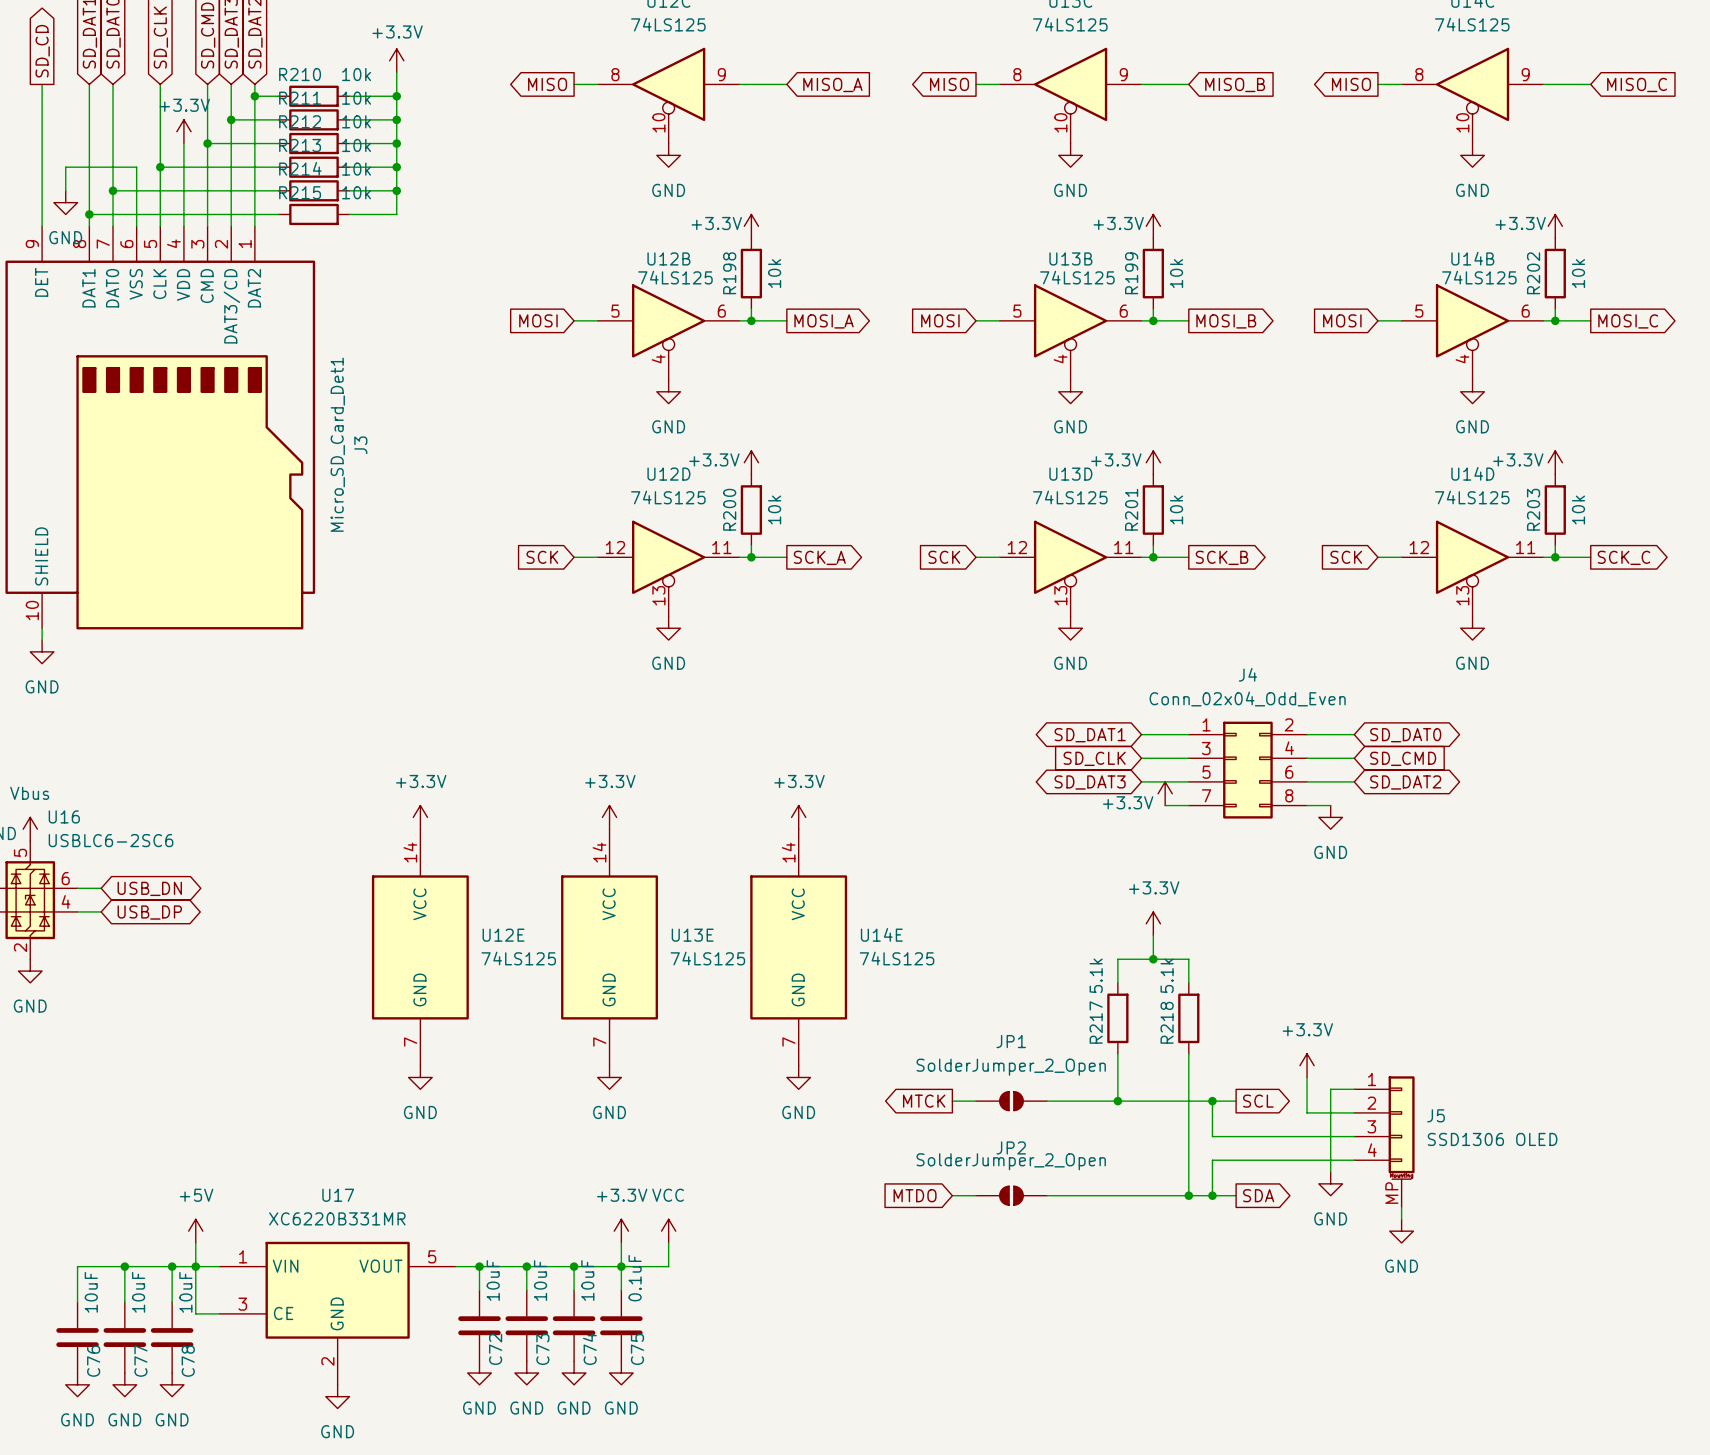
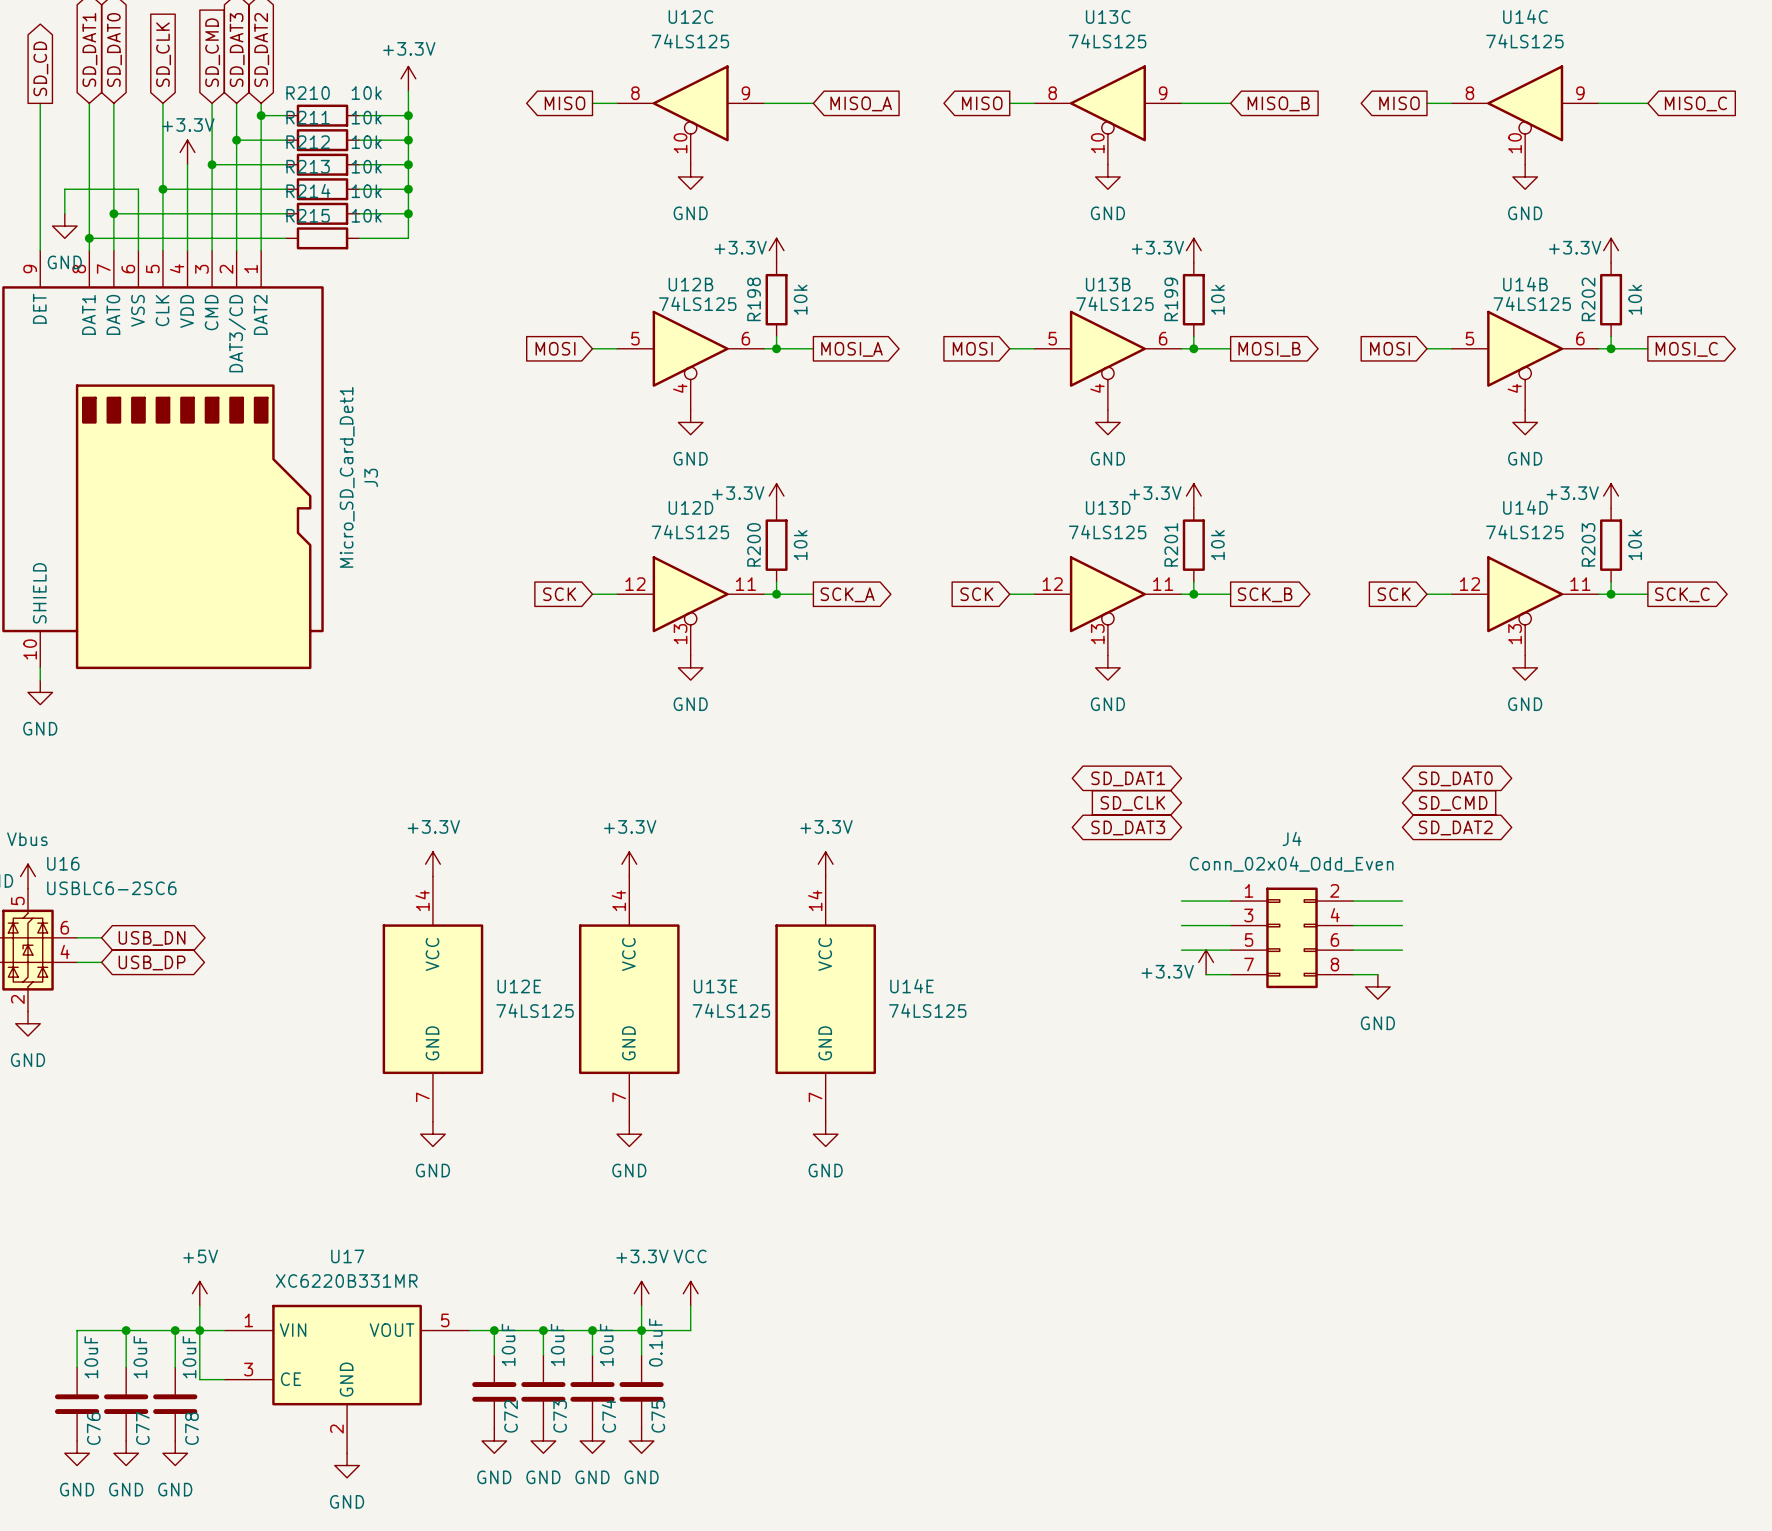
wire: (1141, 734) (1188, 734) -> (1181, 901) (1230, 901)
wire: (1307, 734) (1354, 734) -> (1353, 901) (1402, 901)
wire: (1141, 758) (1188, 758) -> (1181, 925) (1230, 925)
wire: (1307, 758) (1354, 758) -> (1353, 925) (1402, 925)
J4 position: (1247, 770) -> (1292, 937)
wire: (1141, 781) (1188, 781) -> (1181, 950) (1230, 950)
wire: (1307, 781) (1354, 781) -> (1353, 950) (1402, 950)
power symbol: +3.3V (1165, 793) -> none
wire: (1165, 805) (1188, 805) -> (1206, 974) (1230, 974)
wire: (1307, 805) (1330, 805) -> (1353, 974) (1377, 974)
power symbol position: GND (1330, 817) -> GND (1377, 986)
power symbol text position: +3.3V (1154, 887) -> +3.3V (1167, 971)
power symbol position: +3.3V (1153, 923) -> +3.3V (1206, 962)
wire: (1153, 935) (1153, 959) -> none
junction: (1153, 959) -> none
wire: (1117, 982) (1117, 959) (1188, 959) (1188, 982) -> none
R217: 5.1k (1117, 1018) -> none
R218: 5.1k (1188, 1018) -> none
wire: (1117, 1053) (1117, 1101) -> none
wire: (1188, 1053) (1188, 1195) -> none
power symbol: +3.3V (1307, 1065) -> none
wire: (1307, 1077) (1307, 1112) (1354, 1112) -> none
wire: (1354, 1089) (1330, 1089) (1330, 1172) -> none
global label: MTCK (924, 1101) -> none
wire: (952, 1101) (976, 1101) -> none
JP1: SolderJumper_2_Open (1011, 1101) -> none
wire: (1046, 1101) (1236, 1101) -> none
junction: (1117, 1101) -> none
wire: (1212, 1101) (1212, 1136) (1354, 1136) -> none
junction: (1212, 1101) -> none
global label: SCL (1258, 1101) -> none
J5: SSD1306 OLED (1384, 1141) -> none
wire: (1354, 1160) (1212, 1160) (1212, 1195) -> none
power symbol: GND (1330, 1183) -> none
global label: MTDO (915, 1195) -> none
wire: (952, 1195) (976, 1195) -> none
JP2: SolderJumper_2_Open (1011, 1195) -> none
wire: (1046, 1195) (1236, 1195) -> none
junction: (1188, 1195) -> none
junction: (1212, 1195) -> none
global label: SDA (1258, 1195) -> none
wire: (1401, 1207) (1401, 1219) -> none
power symbol: GND (1401, 1231) -> none

